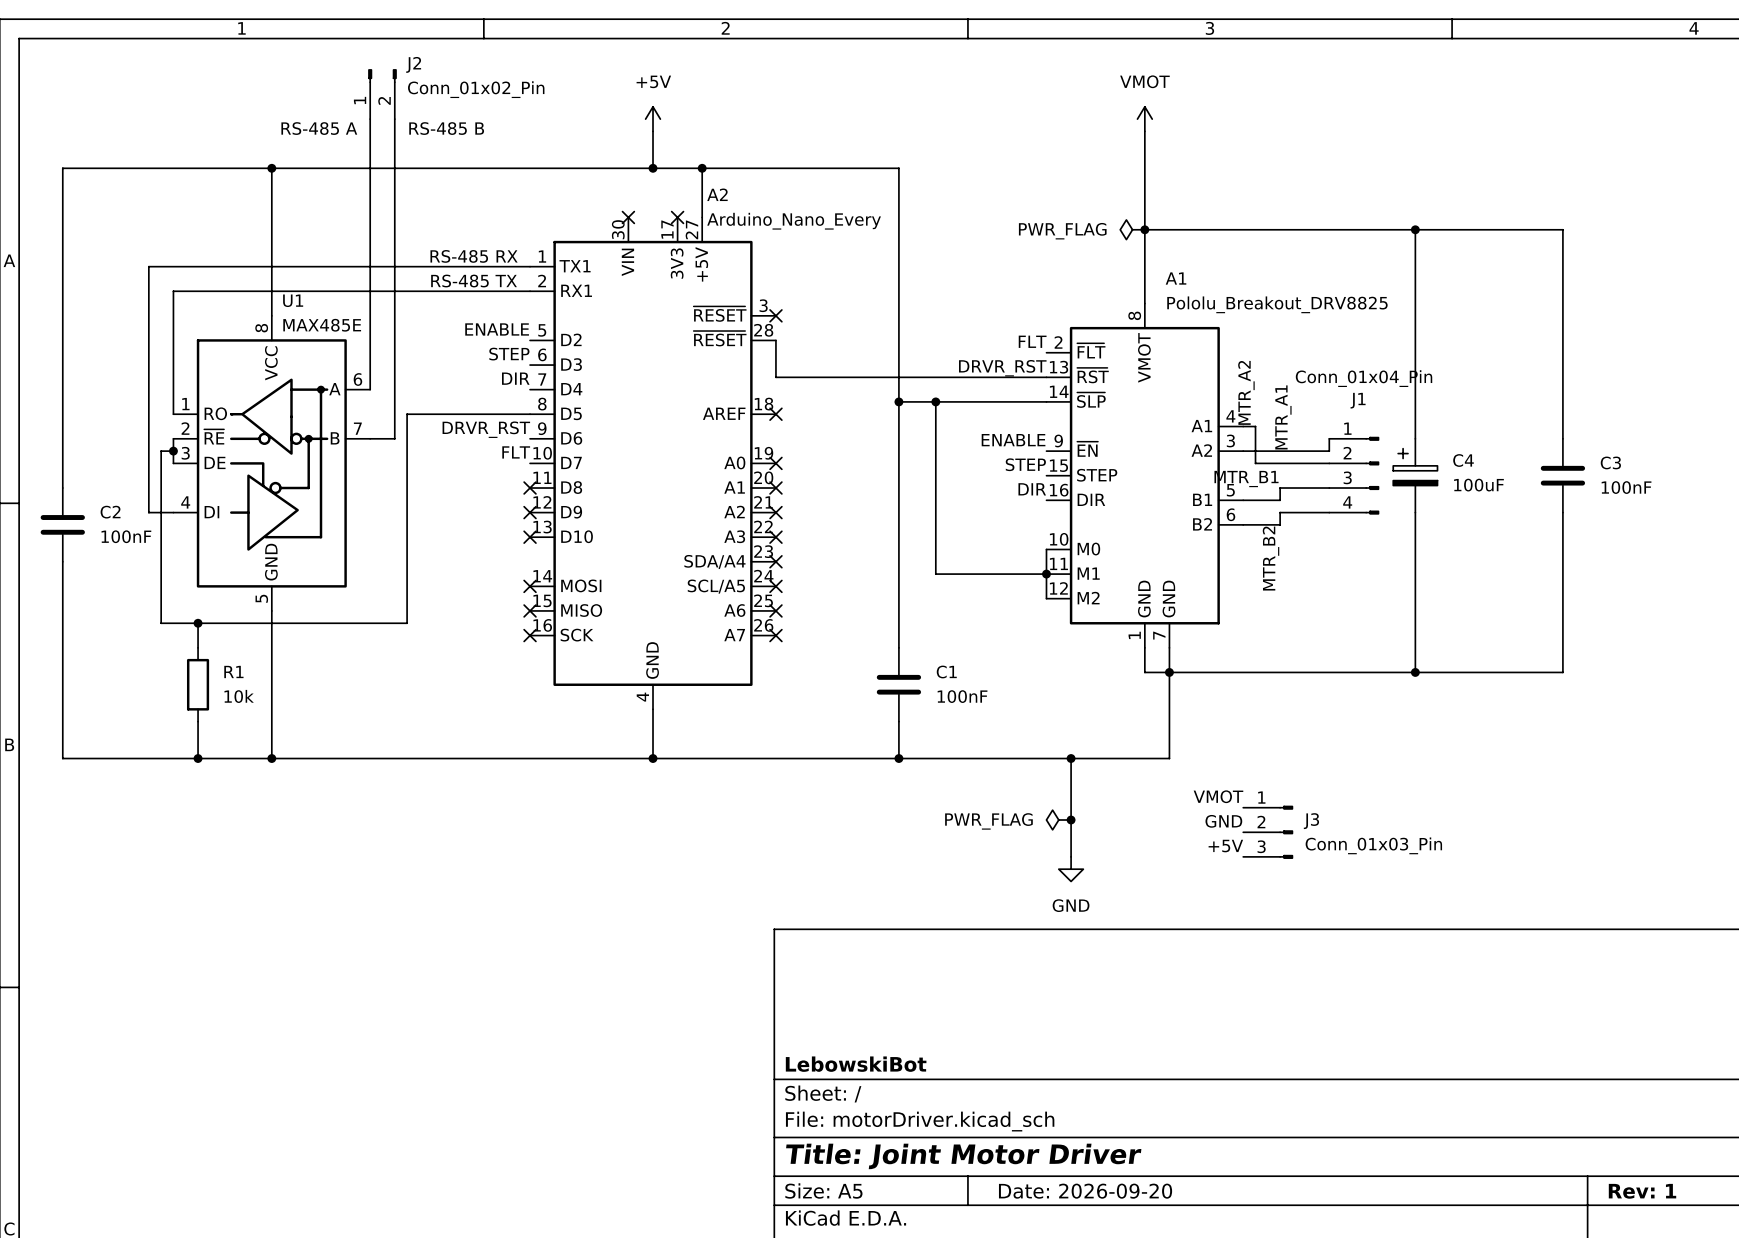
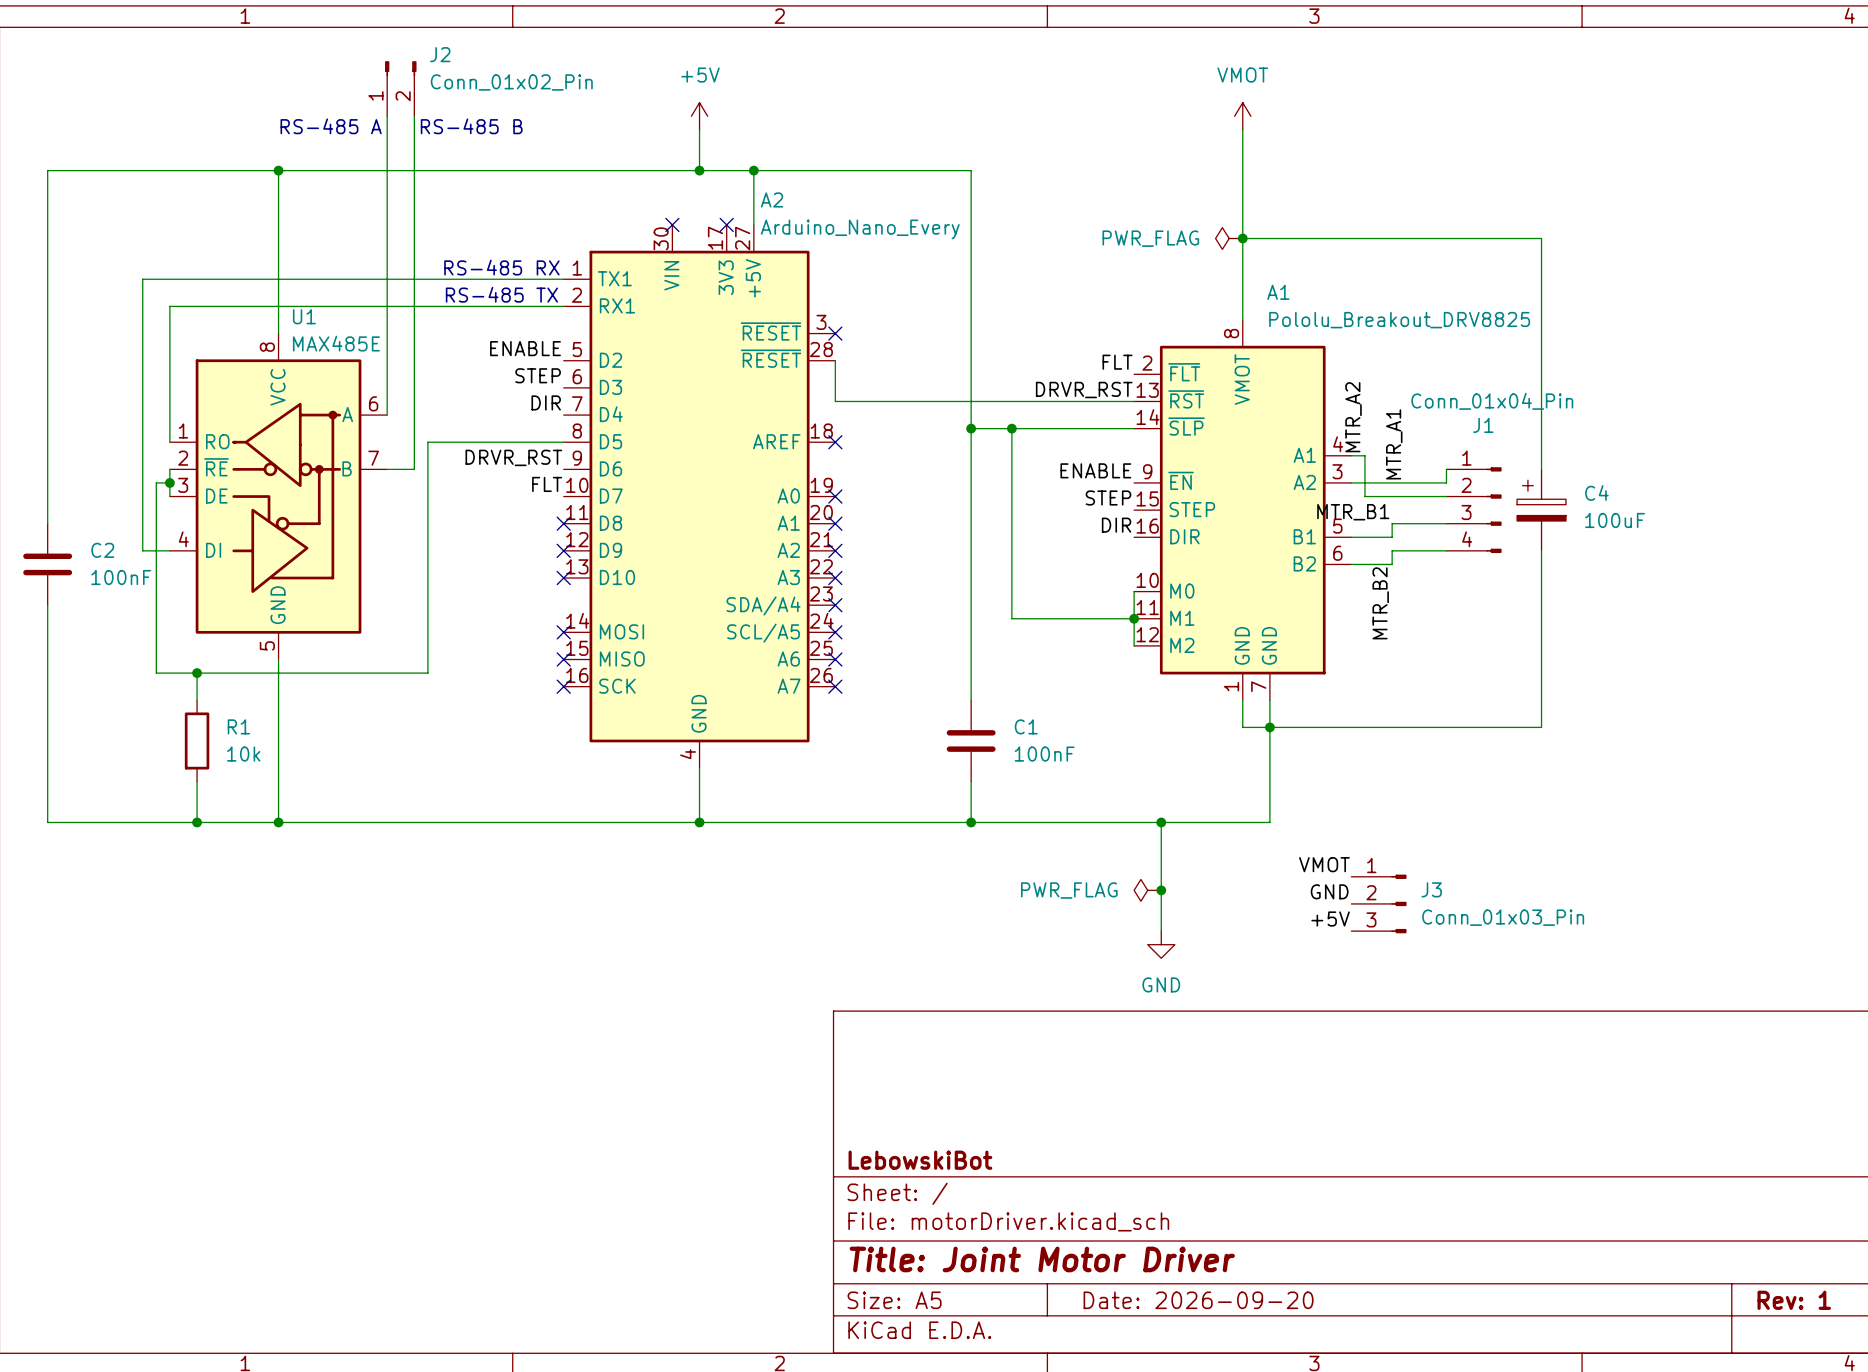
wire: (1415, 229) (1562, 229) (1562, 438) -> none
junction: (1415, 229) -> none
C3: 100nF (1562, 475) -> none
wire: (1562, 512) (1562, 672) (1415, 672) -> none
junction: (1415, 672) -> none

